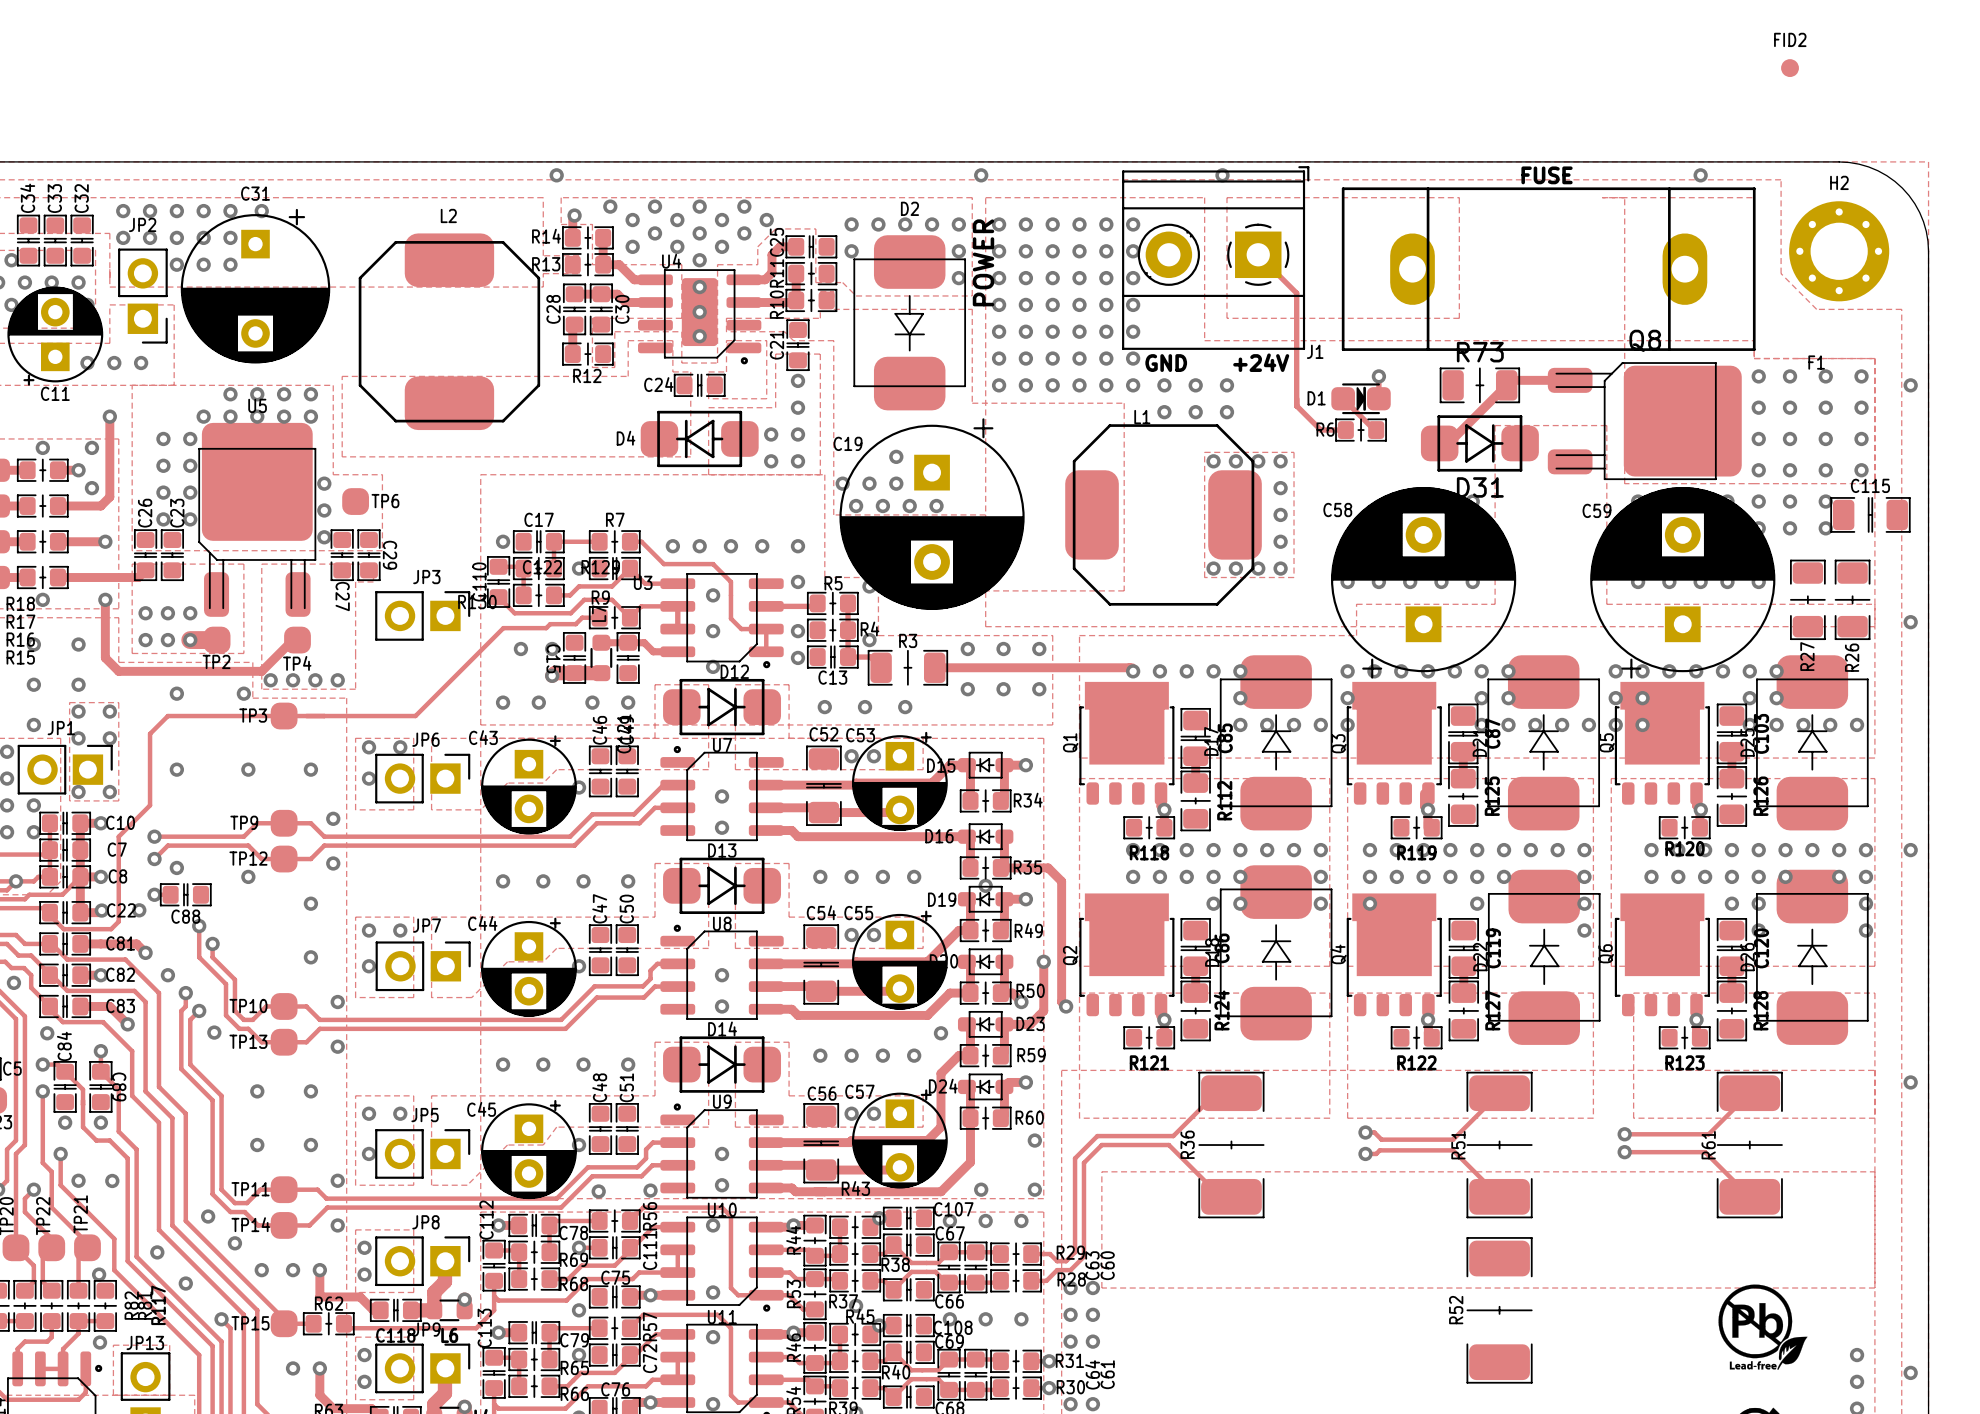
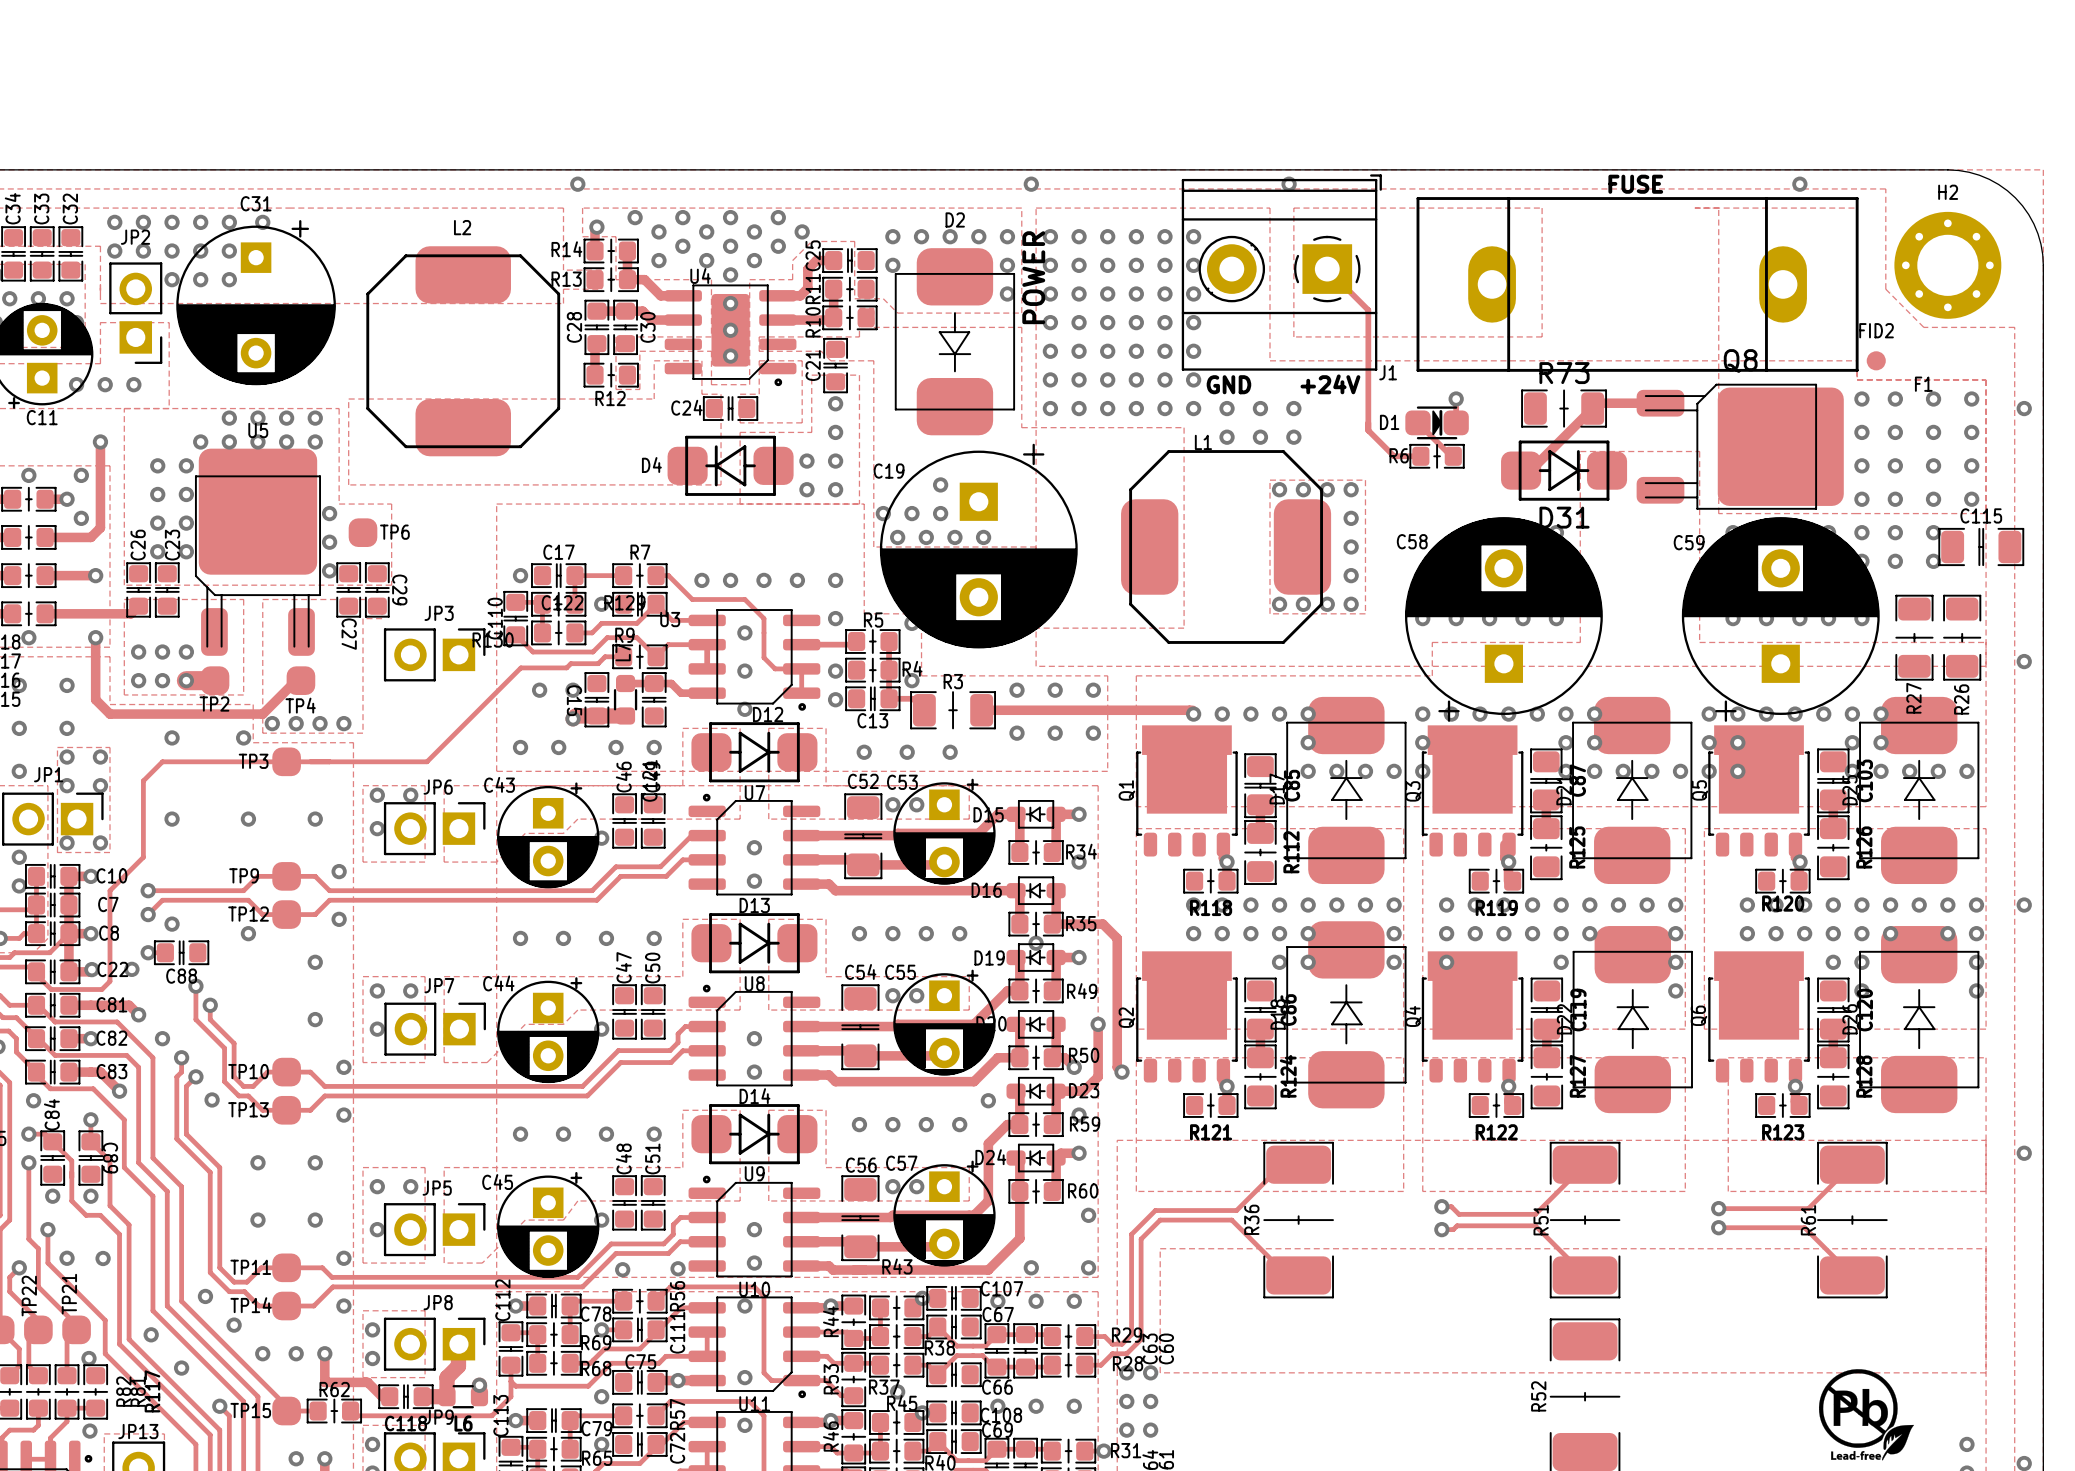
FID2 position: (1790, 68) -> (1876, 360)
via: none -> (1079, 862)
via: none -> (1079, 1115)

